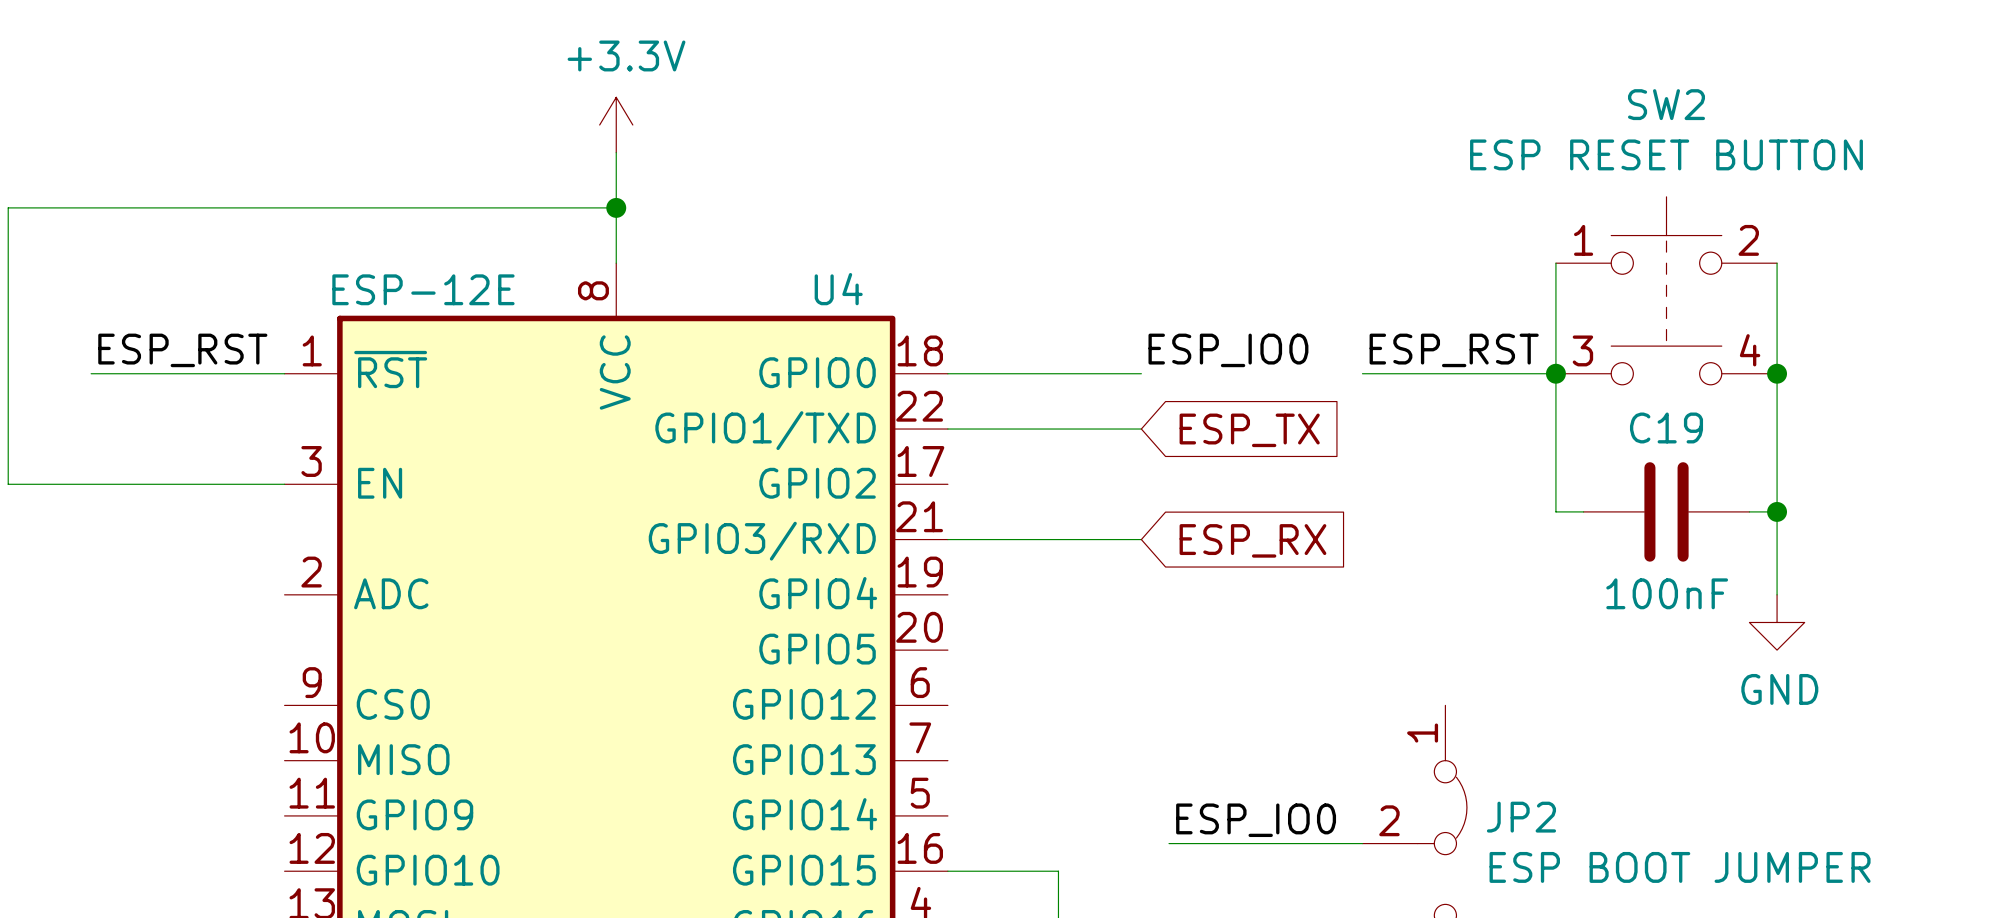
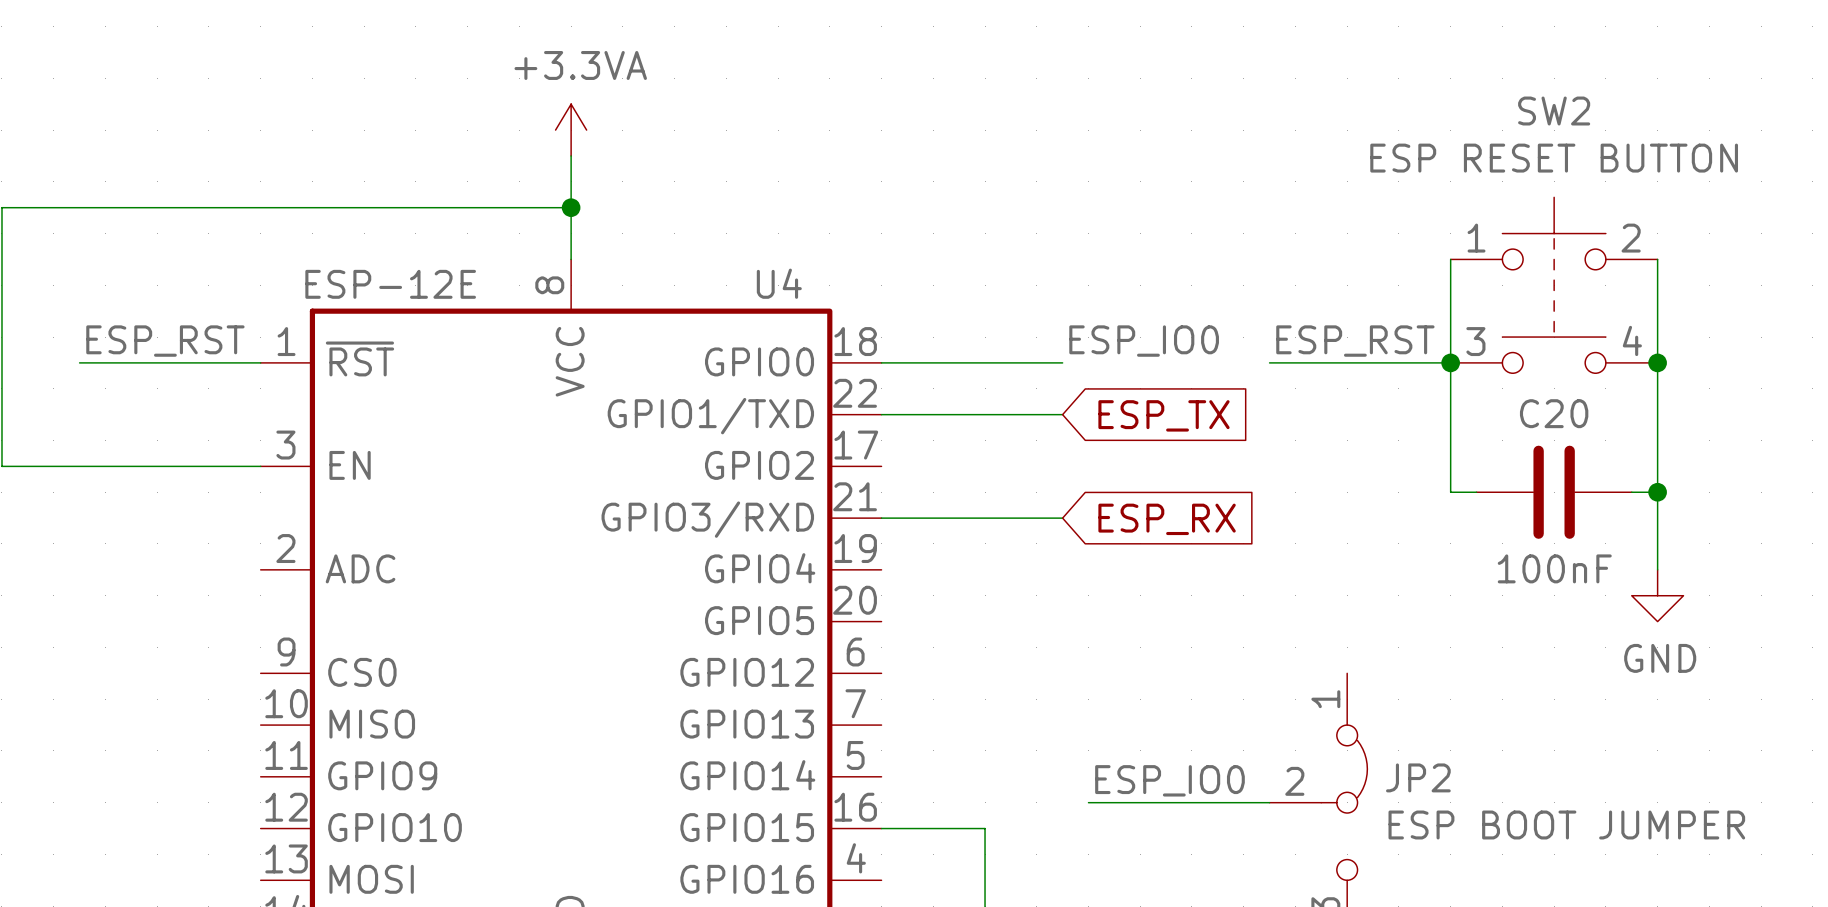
power symbol: +3.3V (616, 125) -> +3.3VA (571, 130)
C19 name: C19 (1666, 427) -> C20 (1554, 413)

